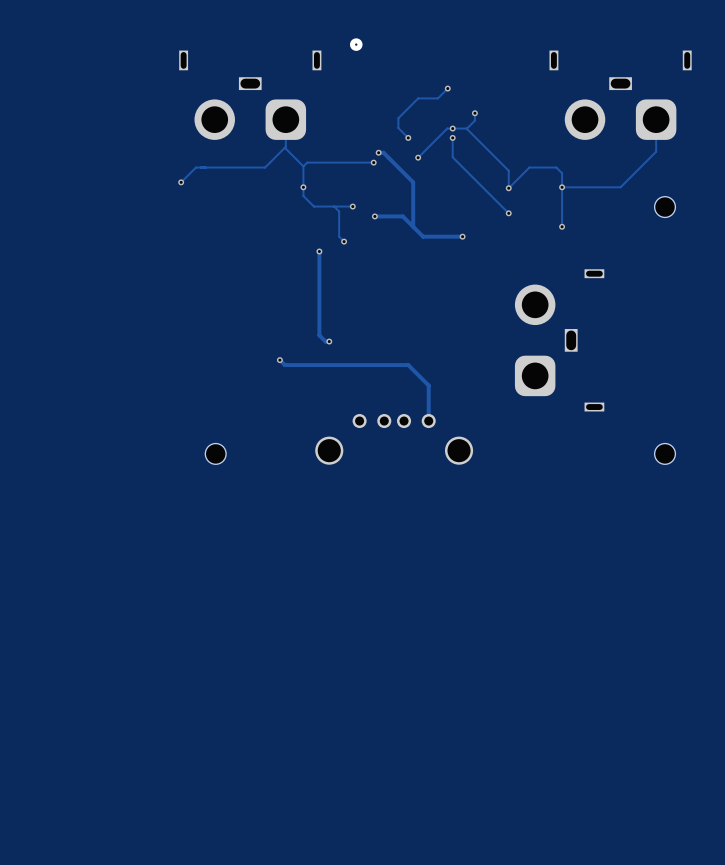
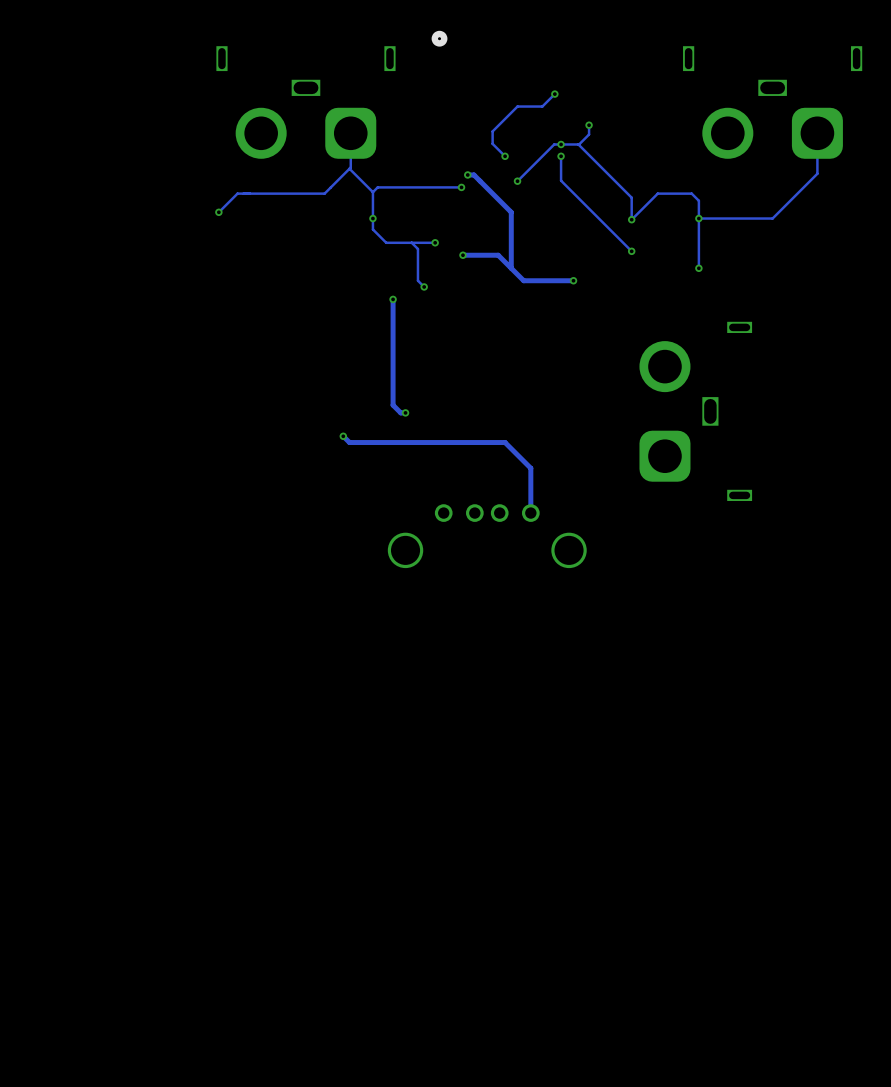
part: (665, 207) -> none
part: (215, 453) -> none
part: (665, 453) -> none

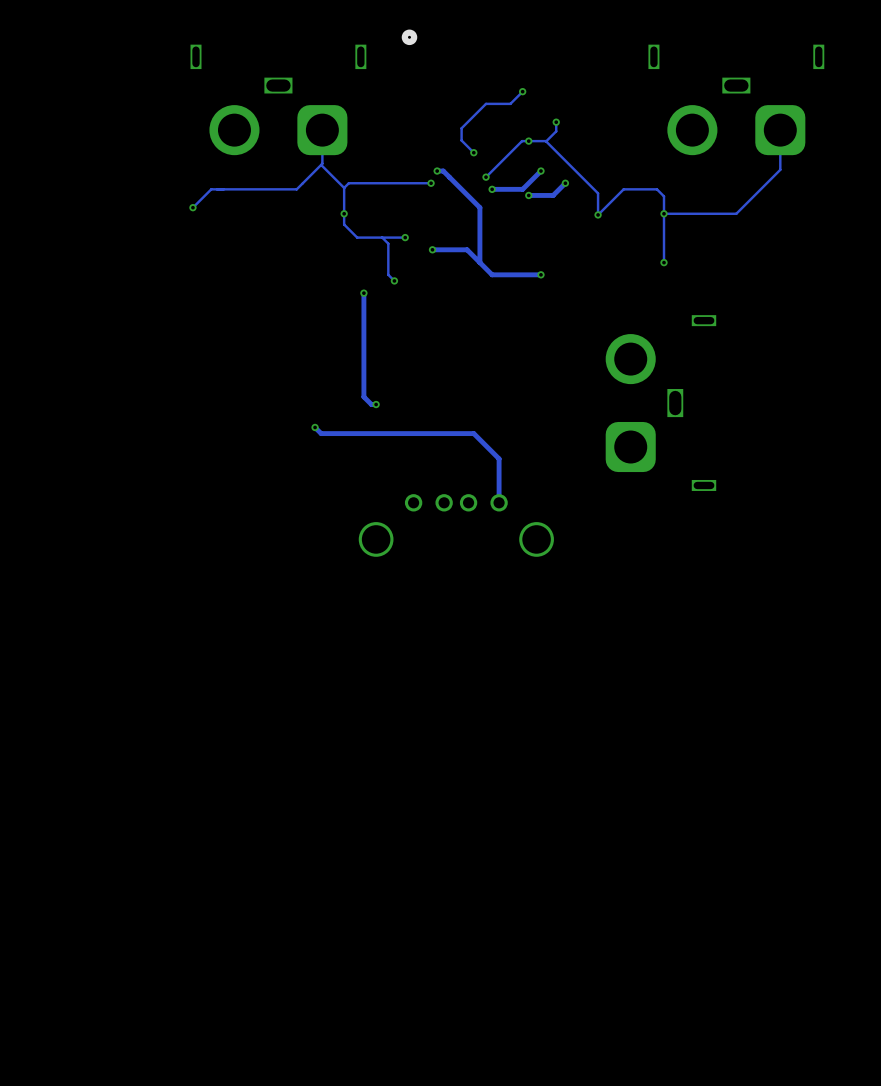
track: (561, 156) (561, 180) (631, 251) -> none
via: (561, 156) -> none
track: none -> (540, 171) (522, 189) (492, 189)
via: none -> (540, 171)
track: none -> (565, 183) (553, 195) (528, 195)
via: none -> (565, 183)
via: none -> (492, 189)
via: none -> (528, 195)
via: (631, 251) -> none

